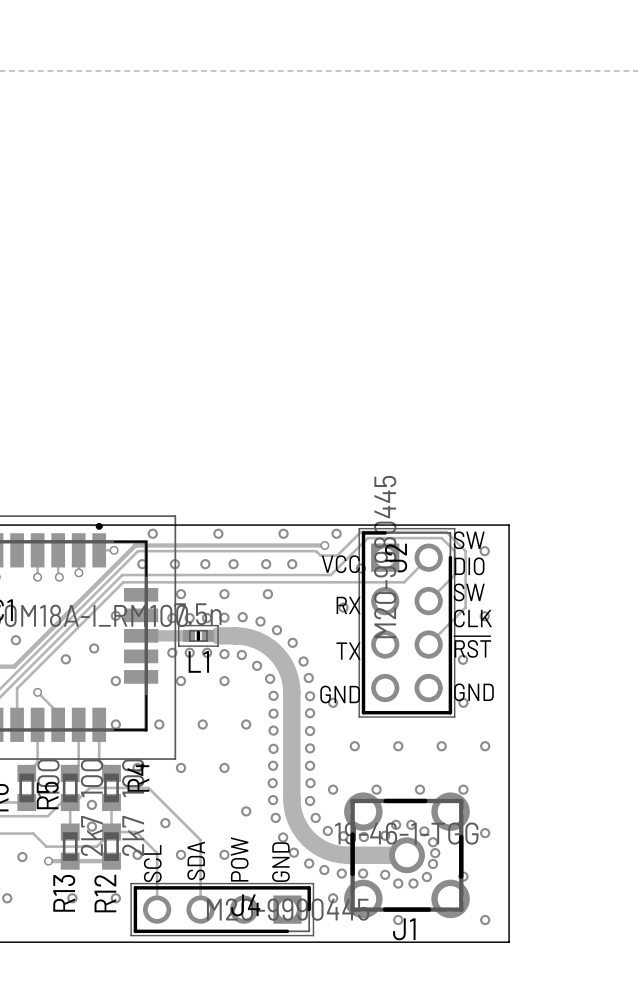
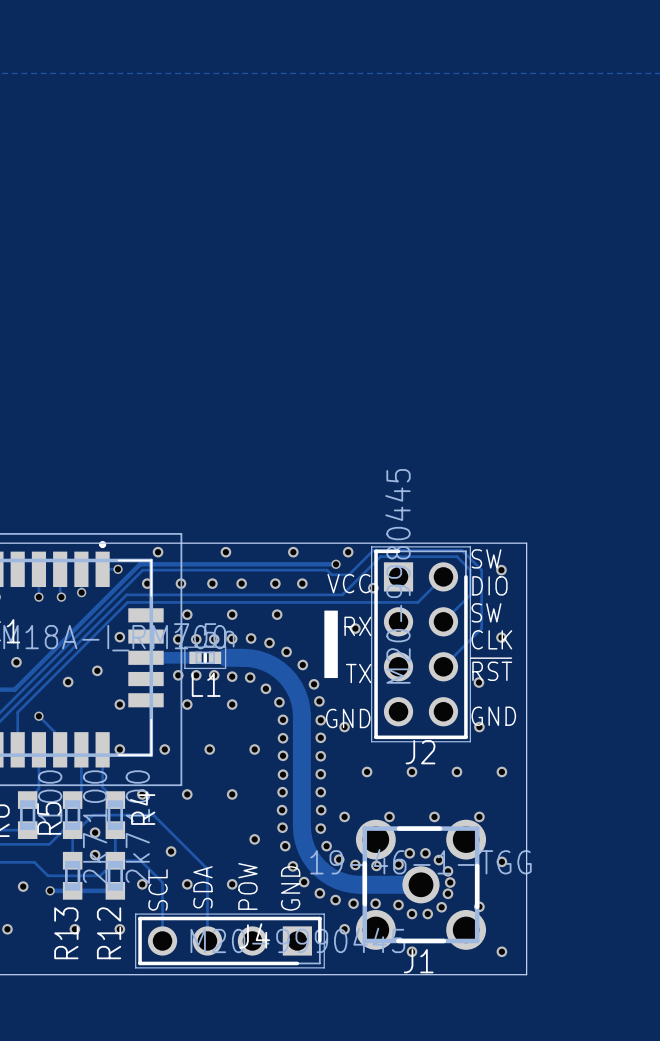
J2 name rotation: 0° (396, 558) -> 90° clockwise (420, 752)
J2 name position: J2 (396, 558) -> J2 (420, 752)
drawing: none -> [324, 610, 338, 679]

